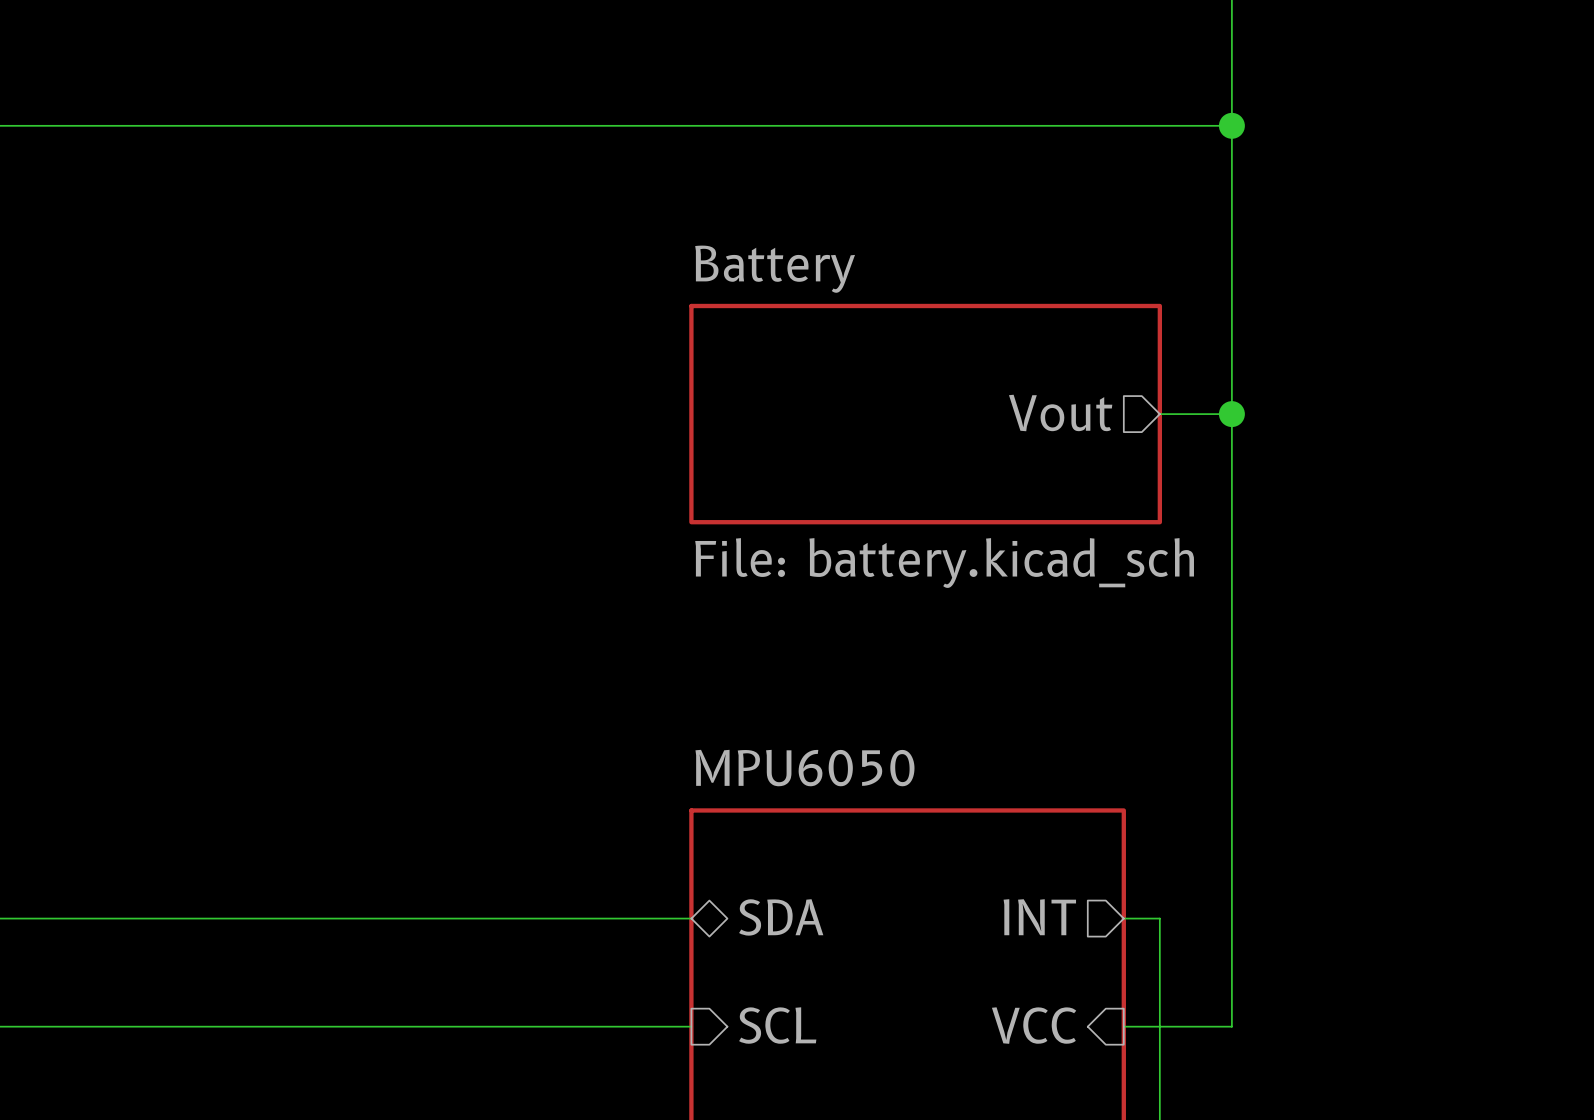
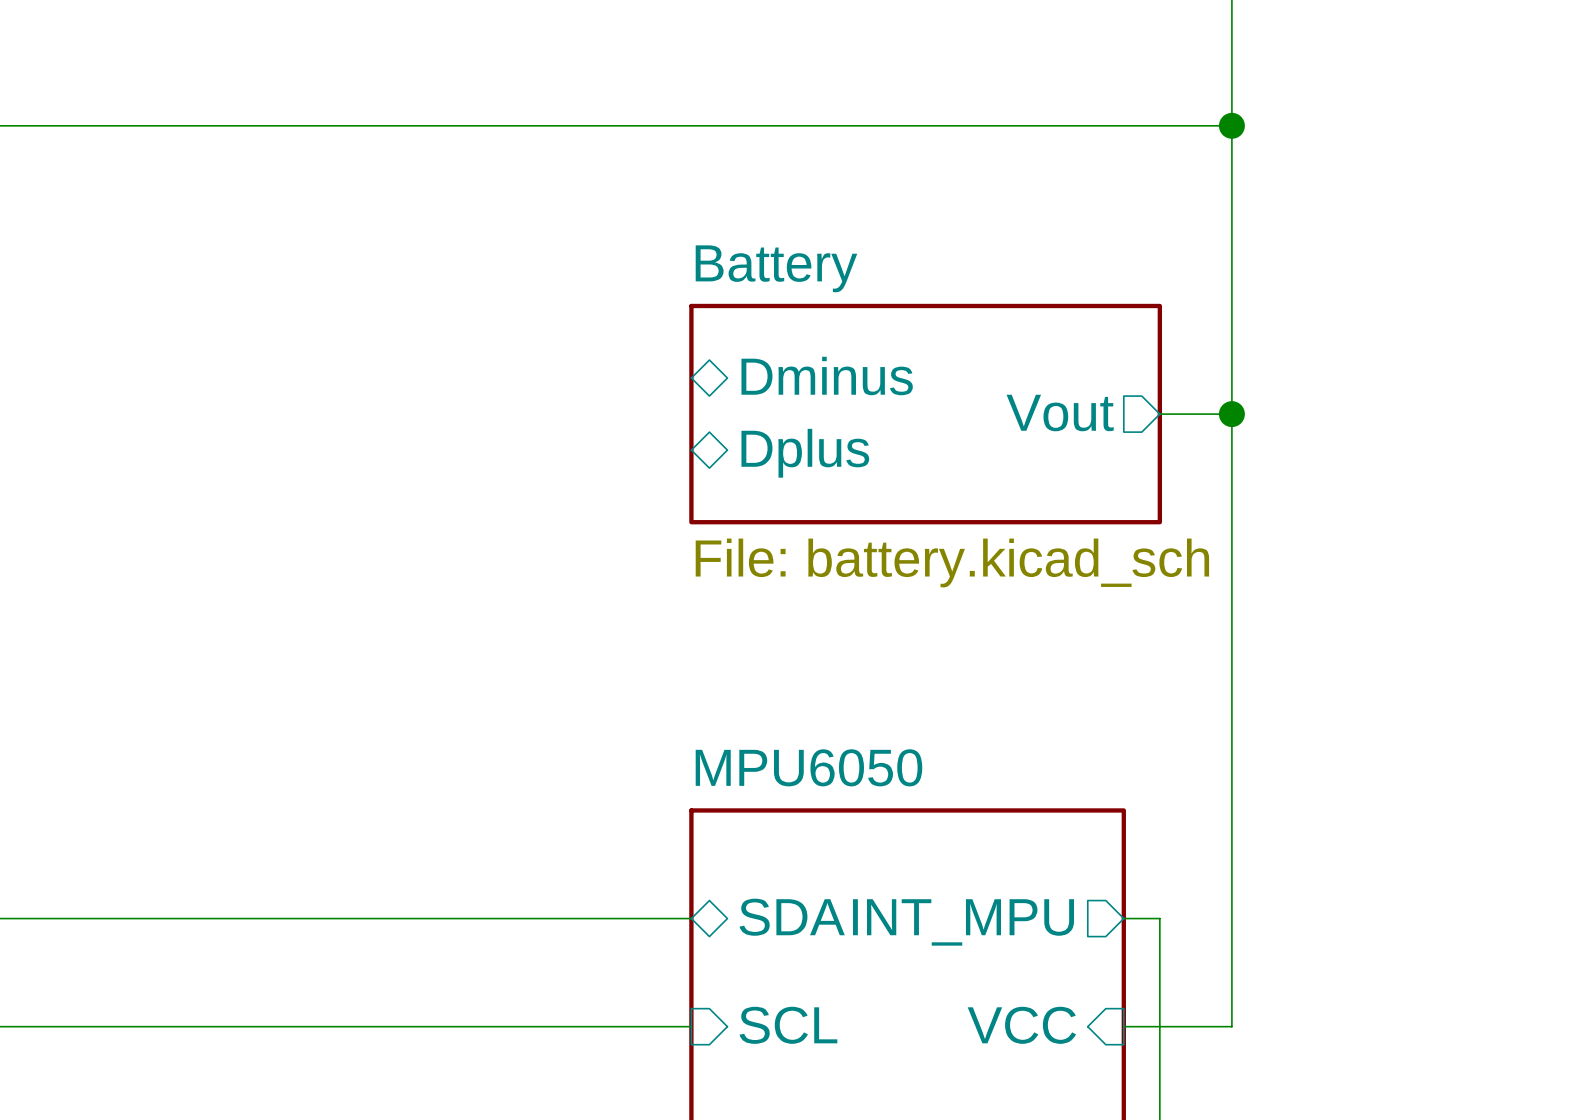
sheet pin: none -> Dminus (827, 376)
sheet pin: none -> Dplus (805, 453)
sheet pin: INT (1039, 917) -> INT_MPU (963, 922)

